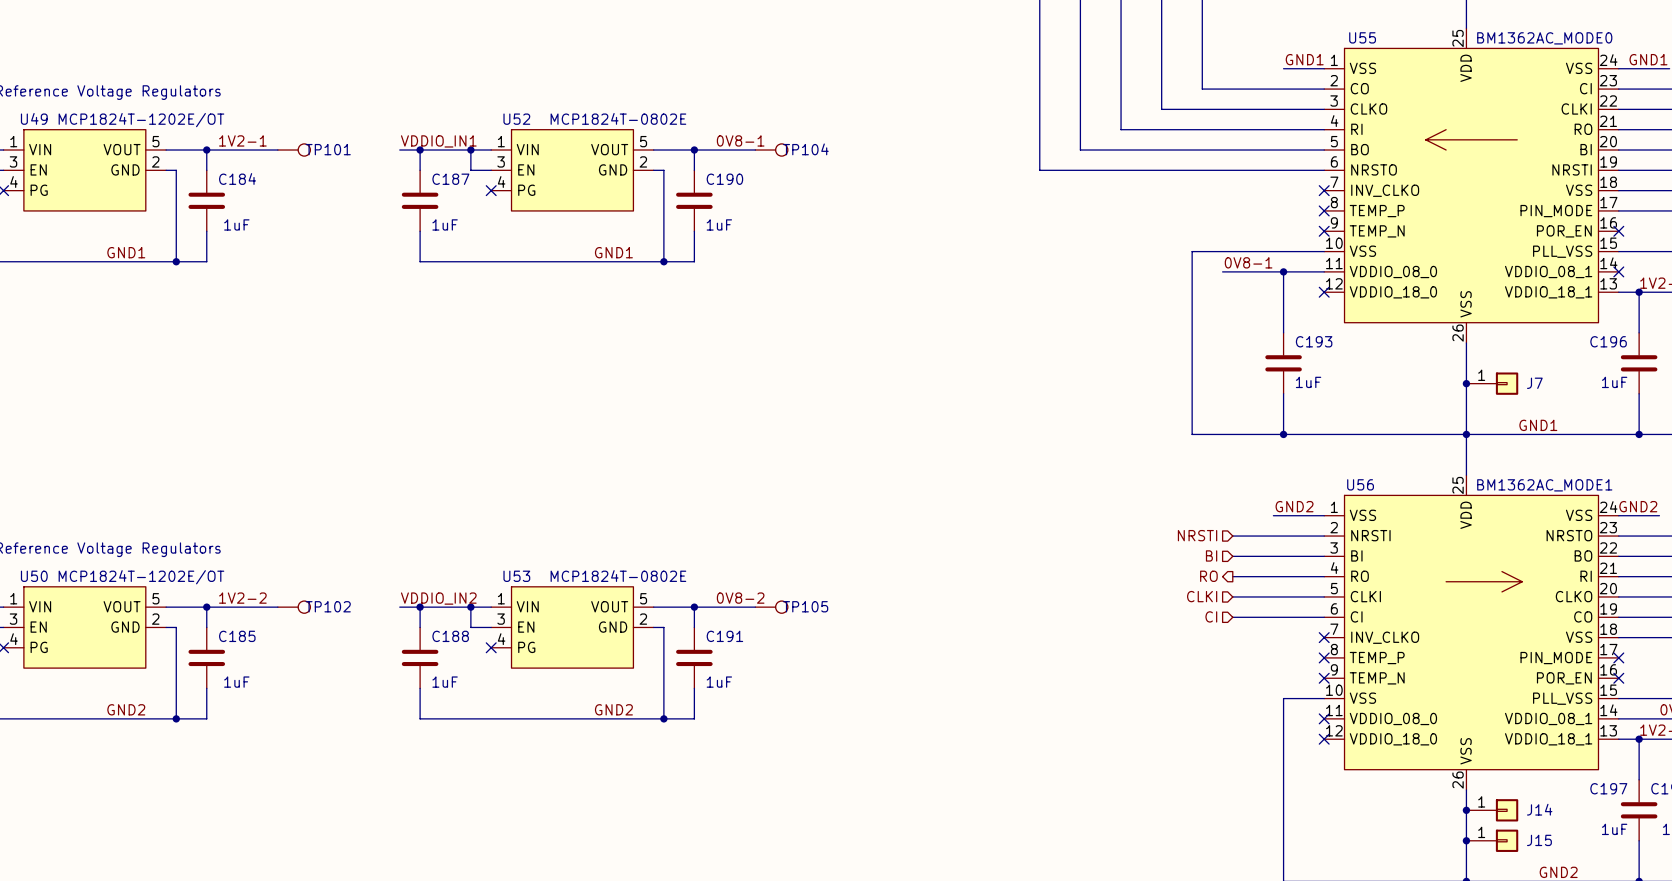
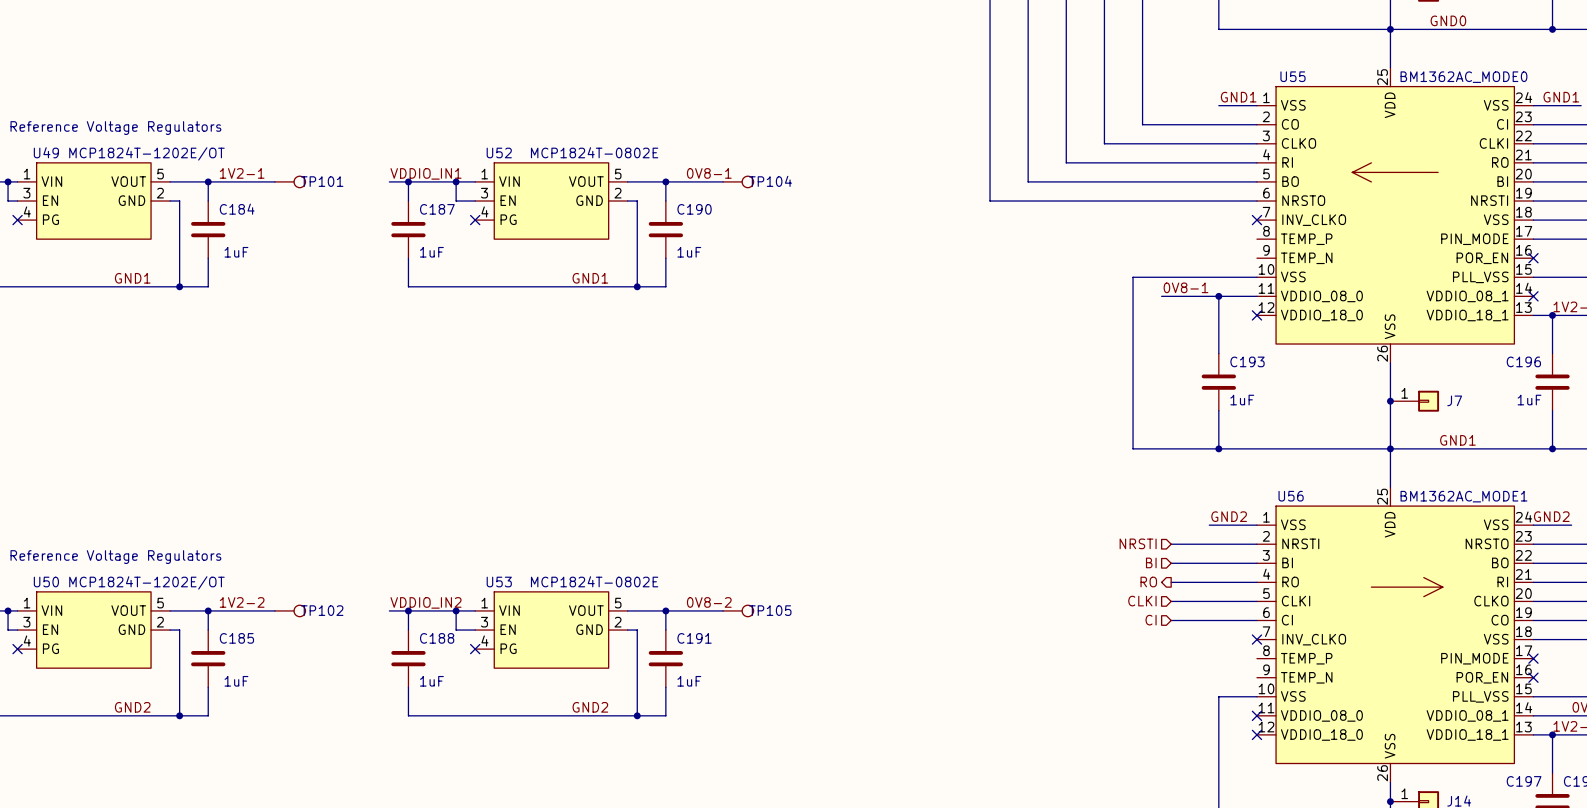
no-connect mark: (1324, 210) -> none
no-connect mark: (1324, 231) -> none
no-connect mark: (1324, 657) -> none
no-connect mark: (1324, 678) -> none

